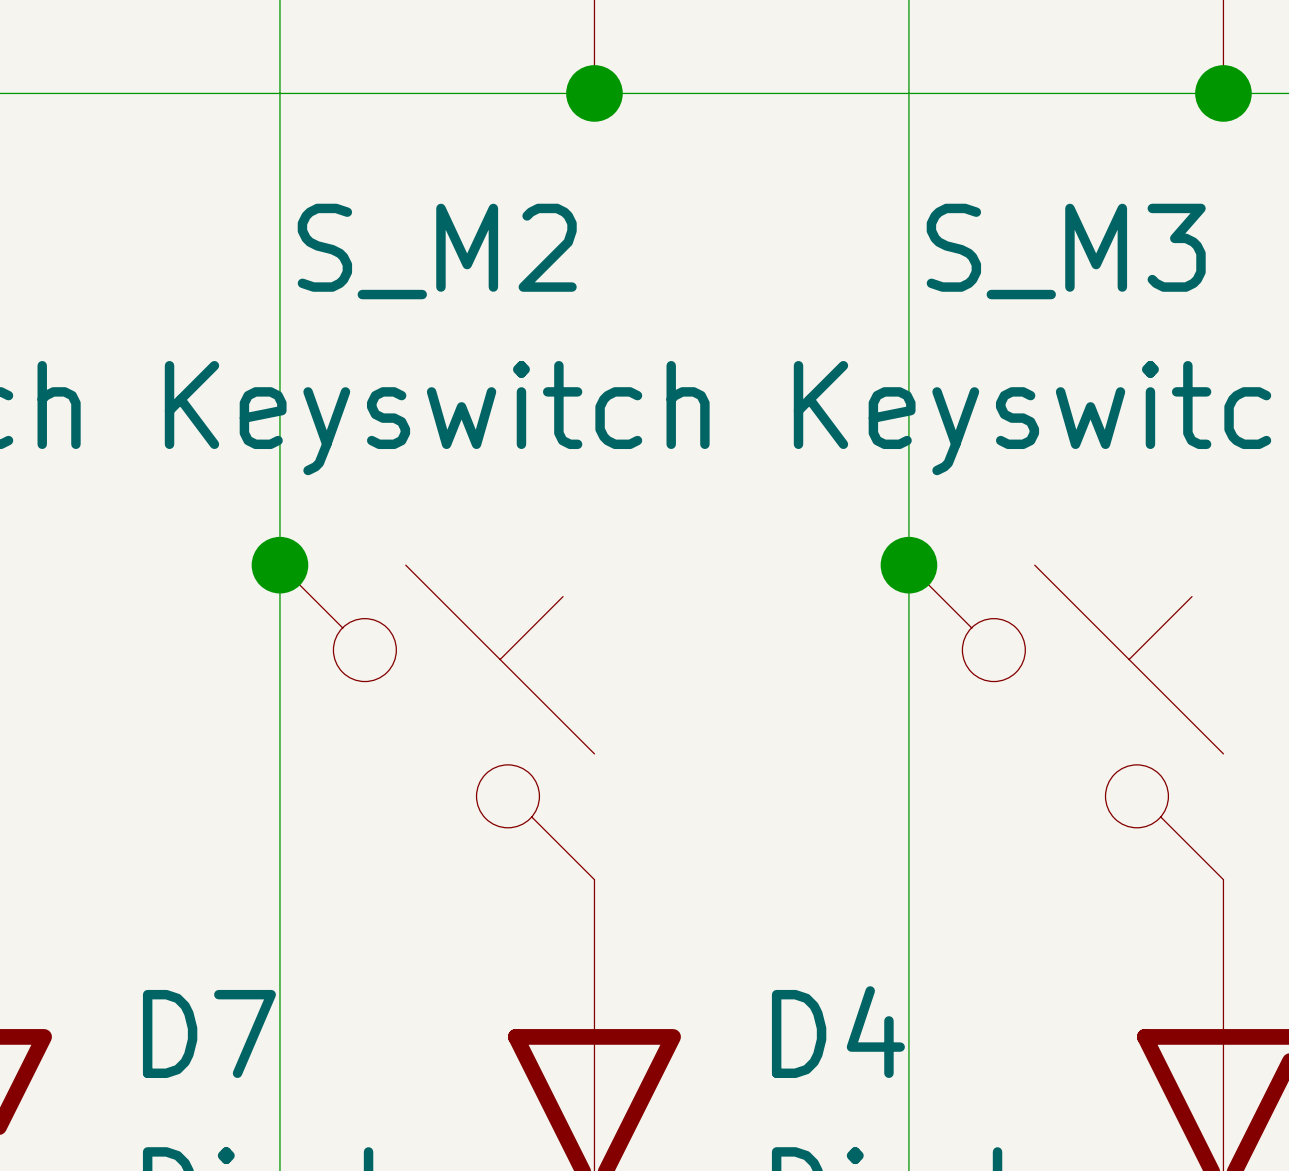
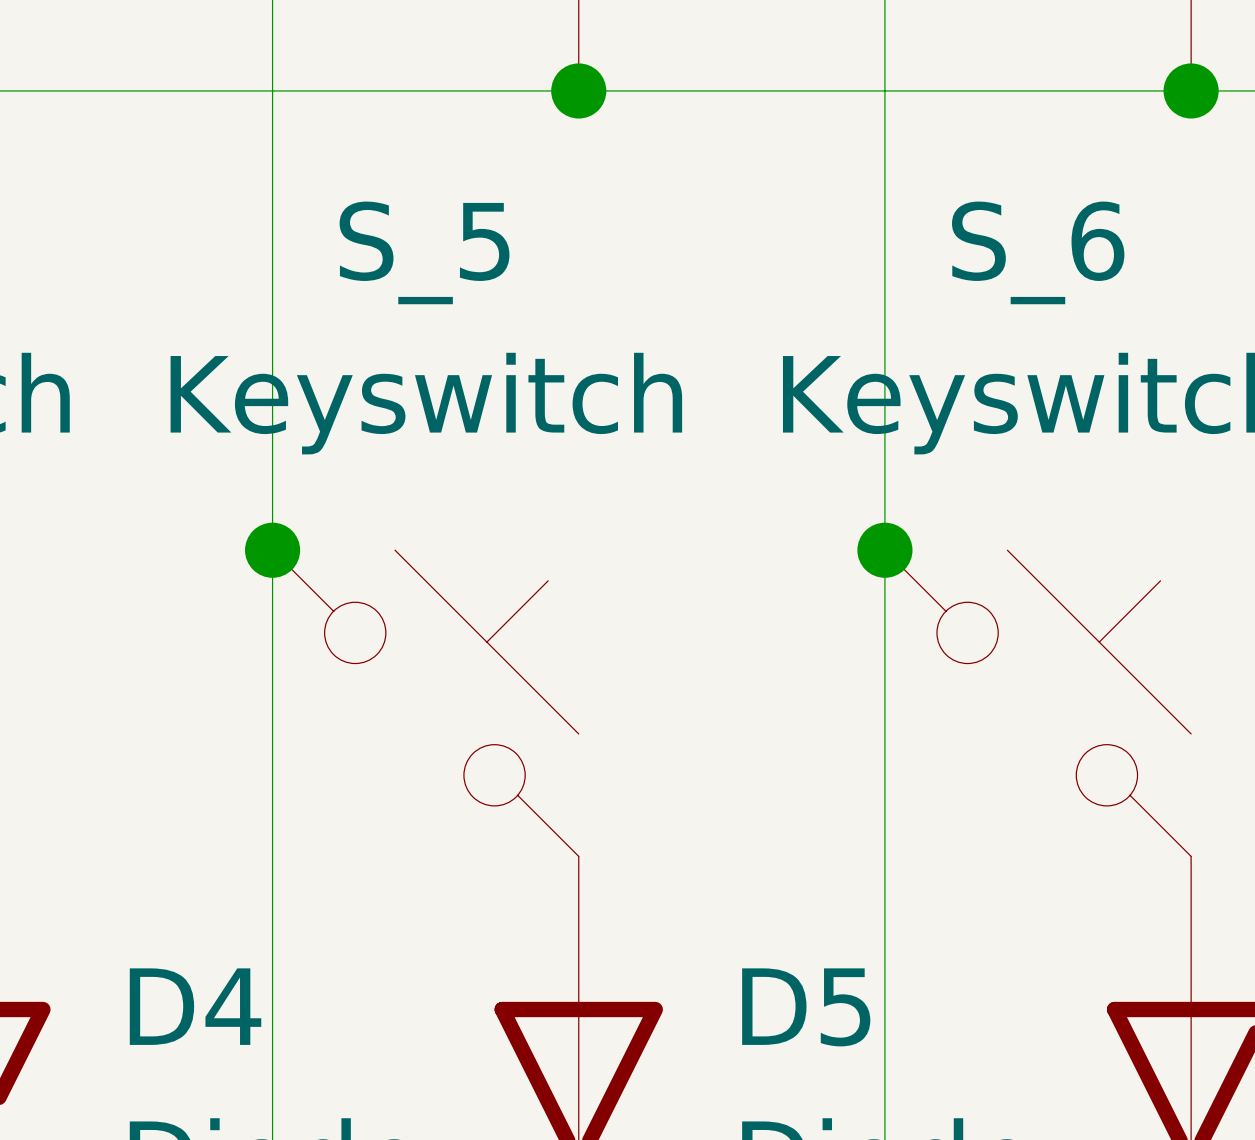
S_M2 name: S_M2 (437, 251) -> S_5 (424, 252)
S_M3 name: S_M3 (1066, 251) -> S_6 (1038, 252)
D4 name: D4 (838, 1032) -> D5 (806, 1007)
D7 name: D7 (209, 1033) -> D4 (195, 1006)

